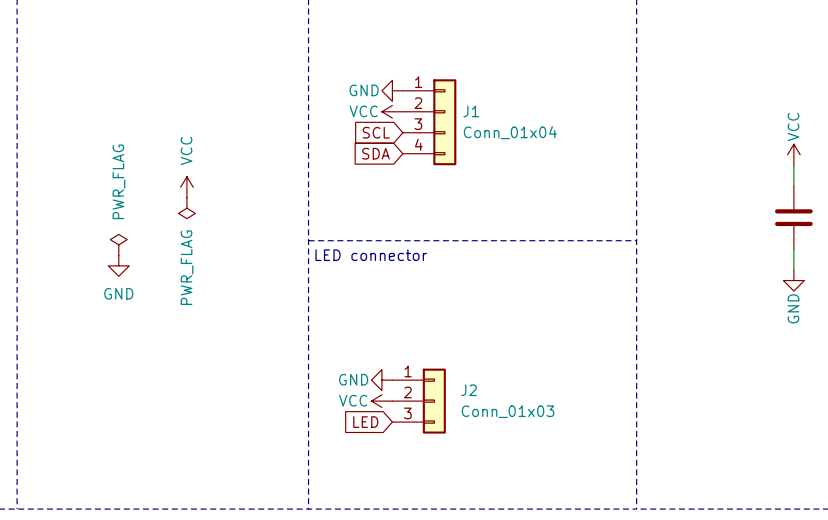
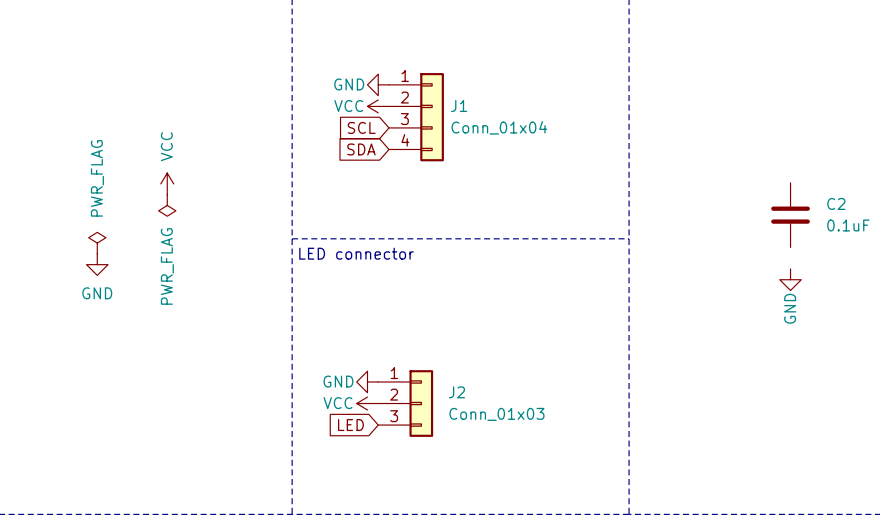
power symbol: VCC (793, 154) -> none
wire: (793, 165) (793, 186) -> none
wire: (793, 249) (793, 270) -> none

